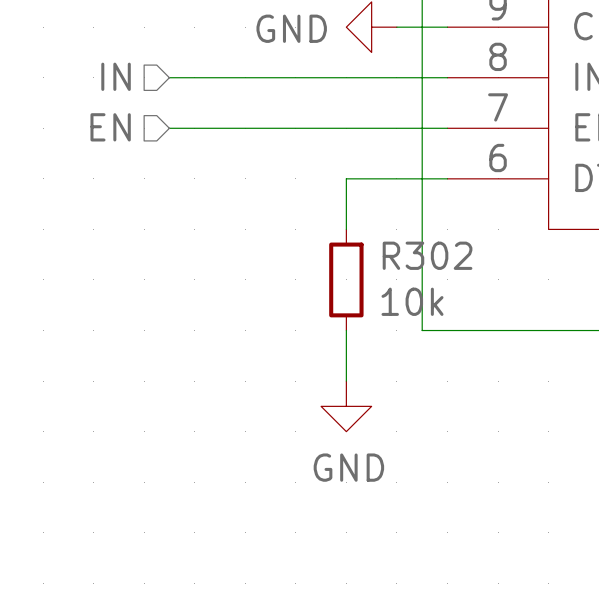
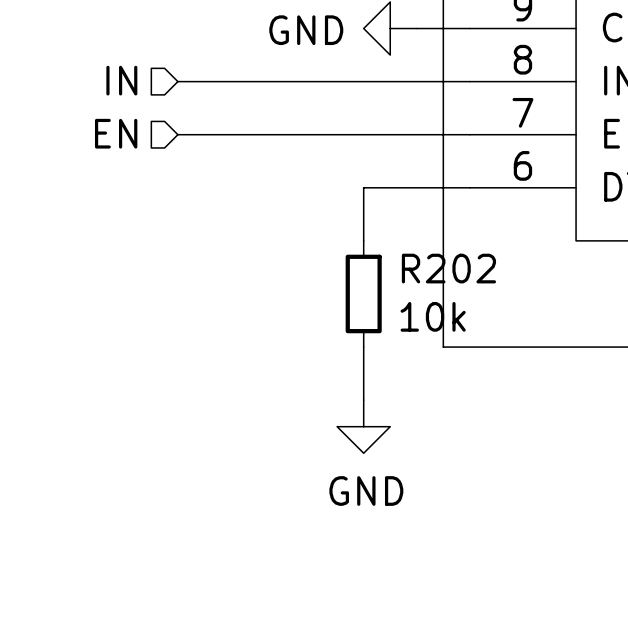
R302 name: R302 (427, 255) -> R202 (448, 268)

